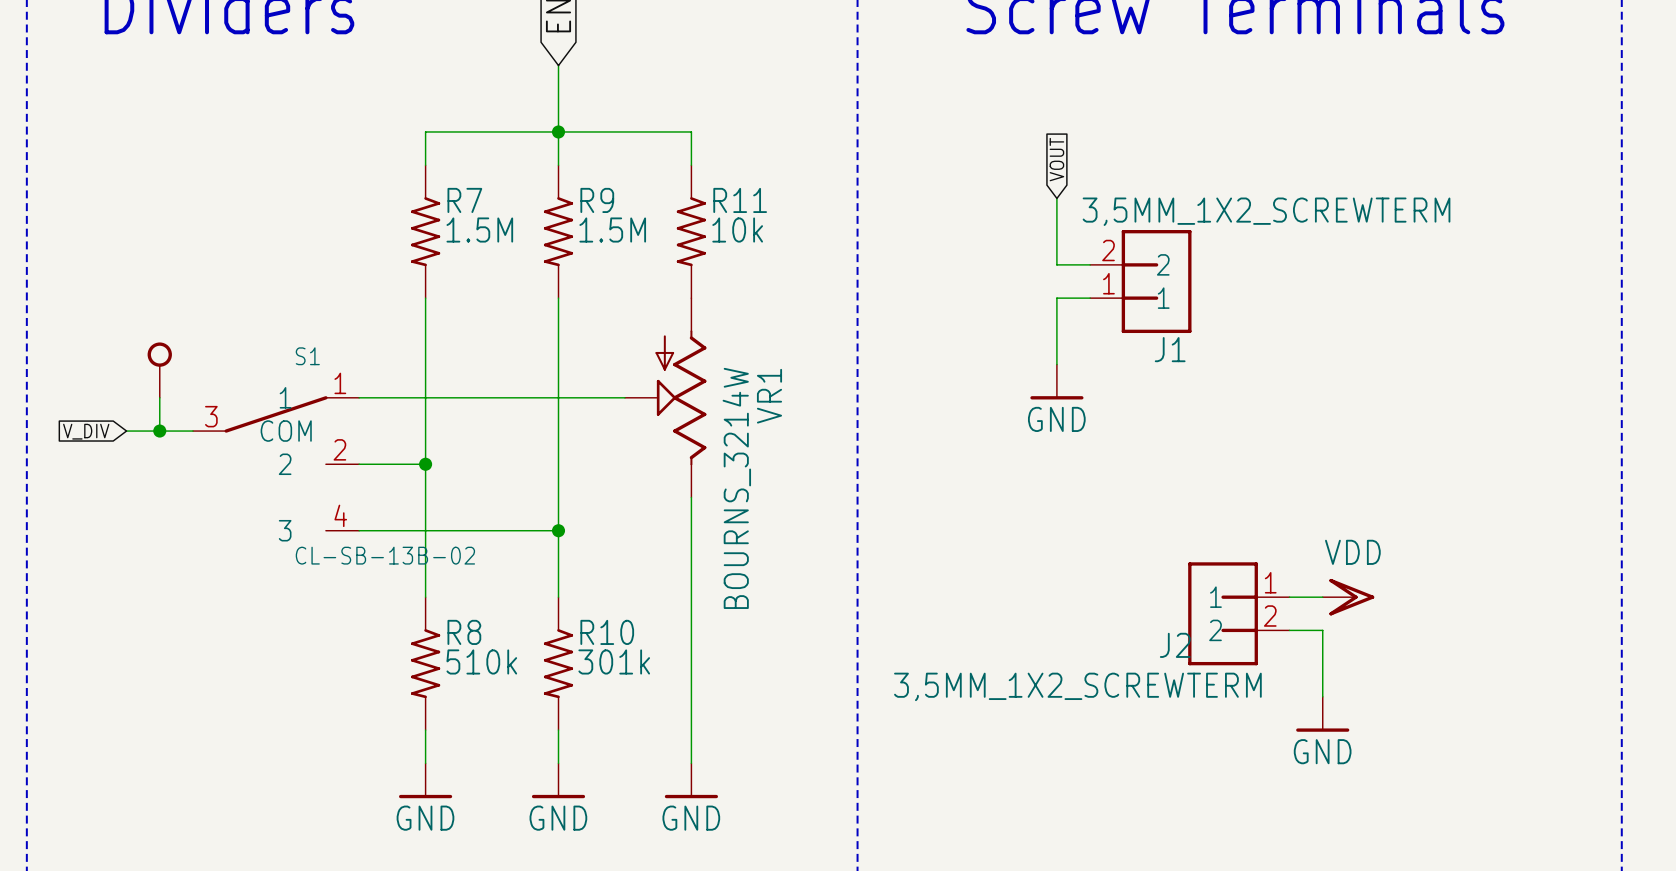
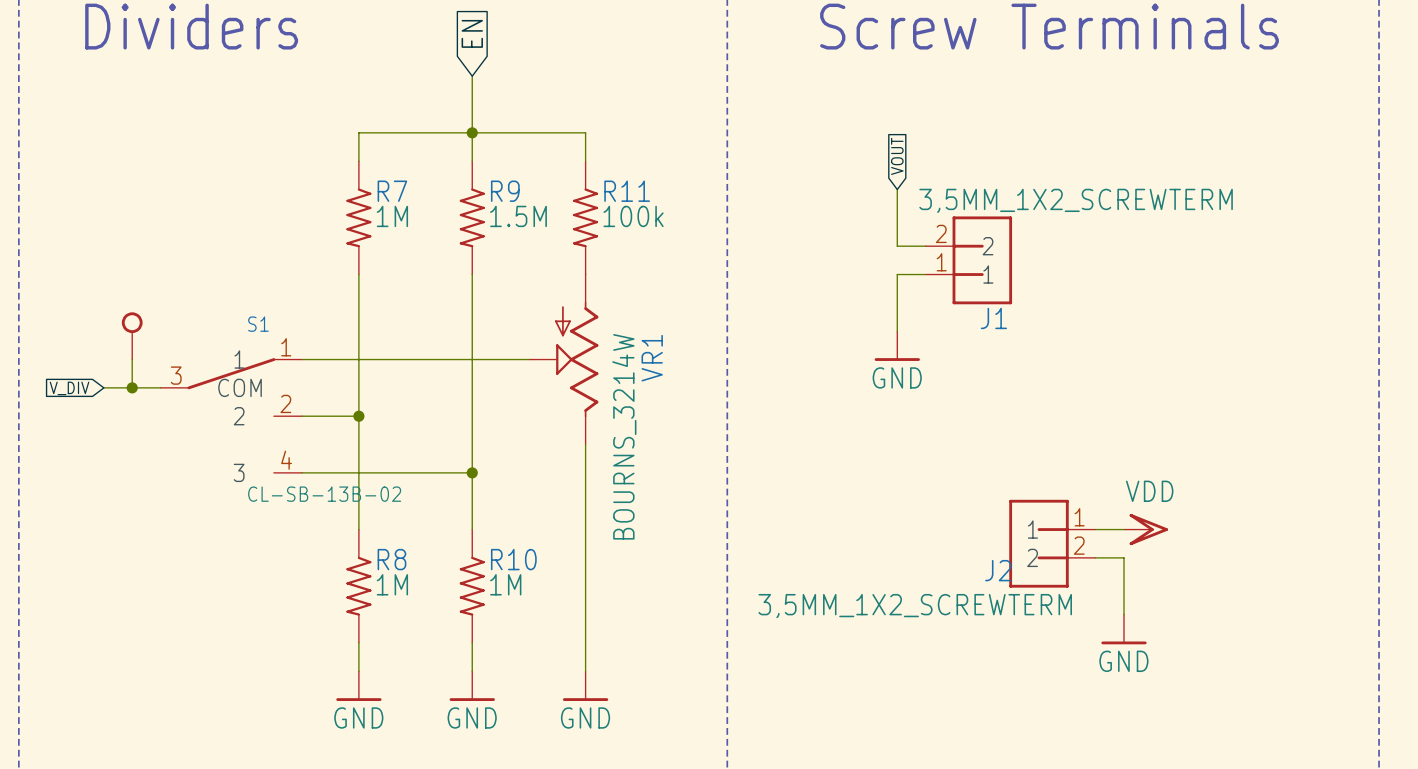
R7 value: 1.5M (479, 230) -> 1M (392, 216)
R11 value: 10k (737, 230) -> 100k (633, 216)
R8 value: 510k (481, 661) -> 1M (392, 584)
R10 value: 301k (614, 661) -> 1M (505, 584)

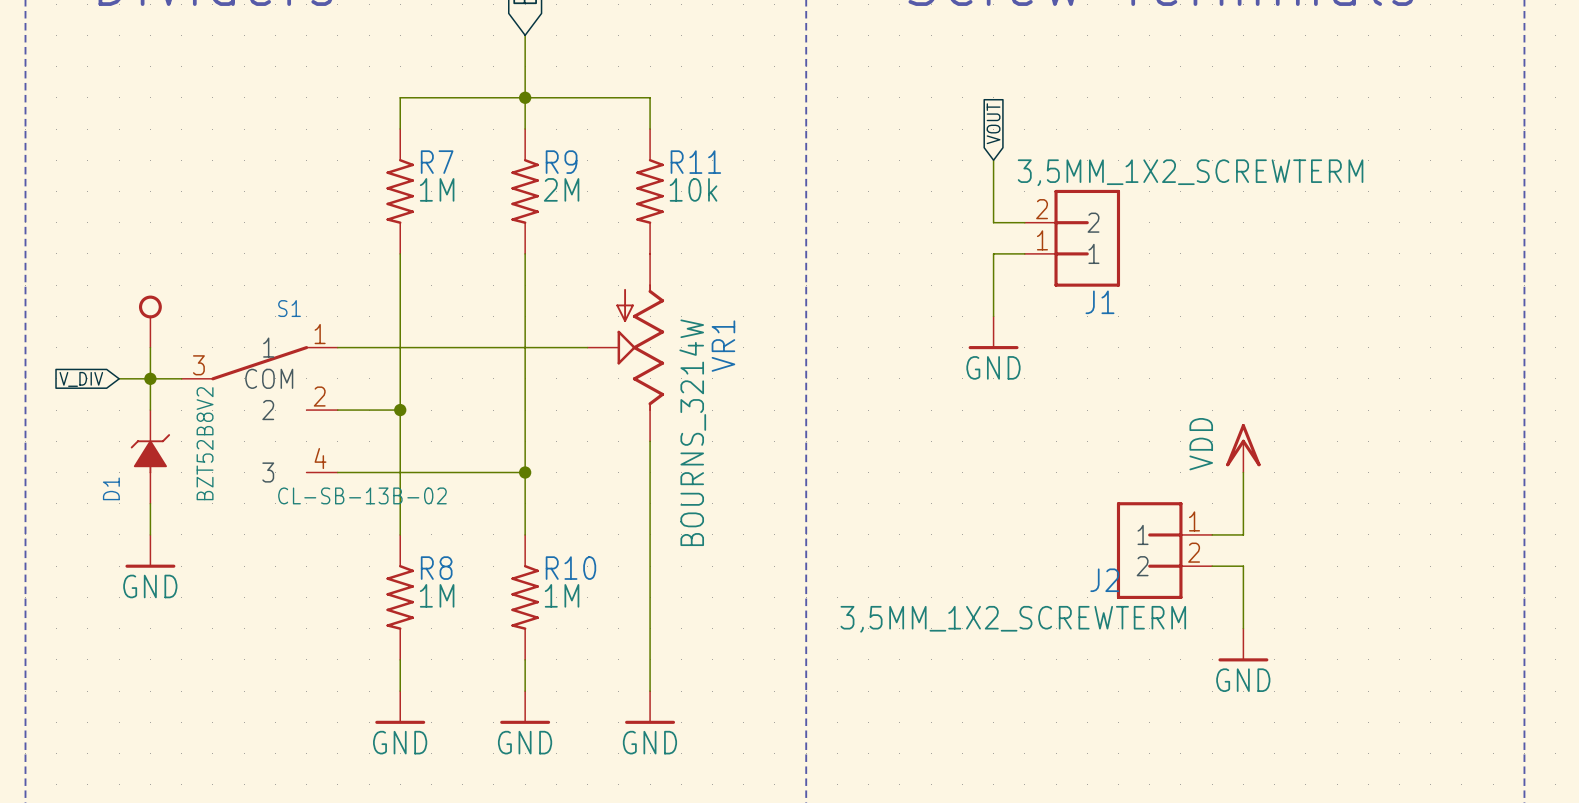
R9 value: 1.5M (518, 216) -> 2M (561, 189)
R11 value: 100k (633, 216) -> 10k (693, 189)
wire: none -> (150, 378) (150, 410)
D1: none -> BZT52B8V2 (150, 456)
wire: none -> (1243, 472) (1243, 534)
wire: none -> (150, 503) (150, 534)
power symbol position: VDD (1145, 529) -> VDD (1243, 448)
power symbol rotation: 0° (1148, 529) -> 90° counterclockwise (1243, 445)
power symbol: none -> GND (150, 551)

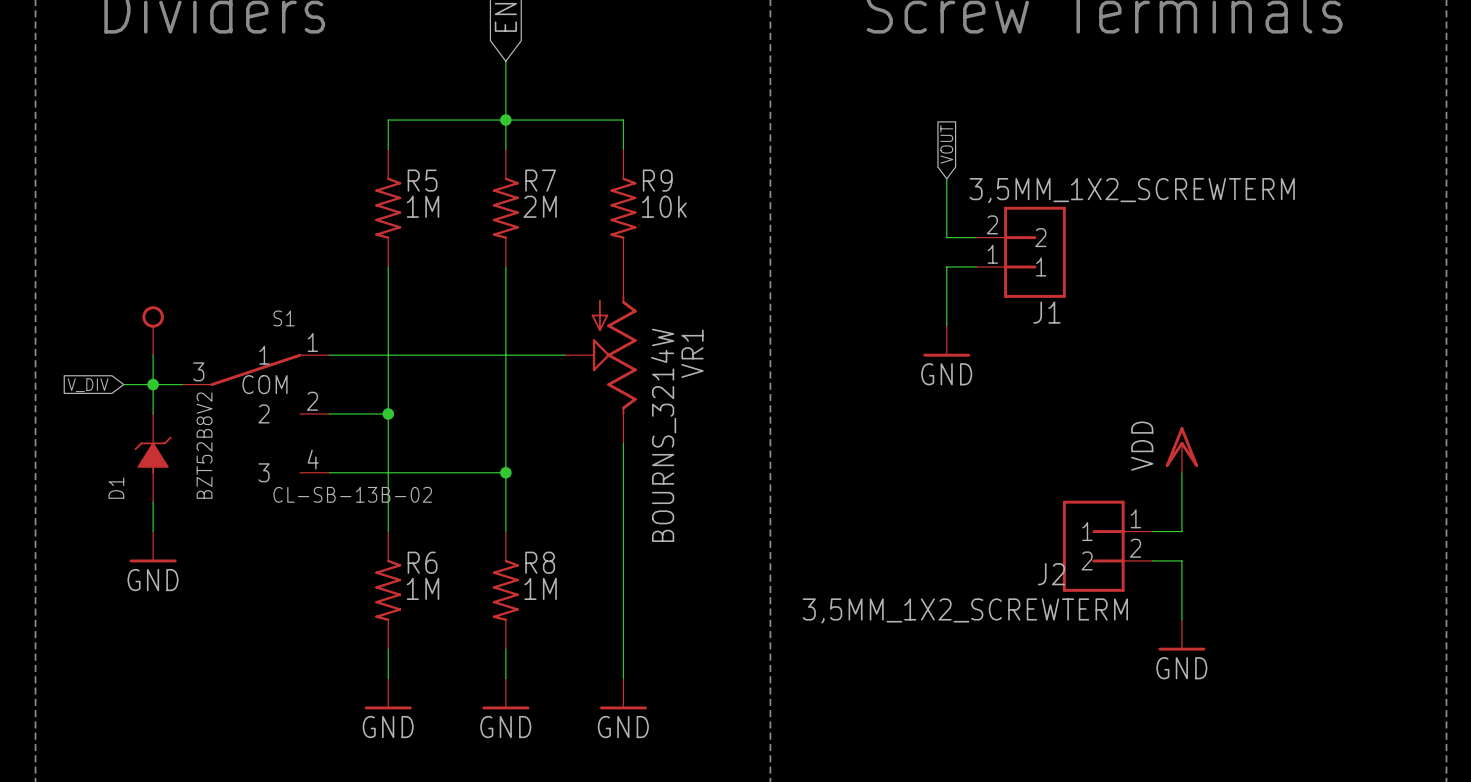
R7 name: R7 (437, 162) -> R5 (422, 180)
R9 name: R9 (561, 162) -> R7 (540, 180)
R11 name: R11 (695, 162) -> R9 (657, 180)
R8 name: R8 (436, 568) -> R6 (422, 562)
R10 name: R10 (570, 568) -> R8 (540, 562)

